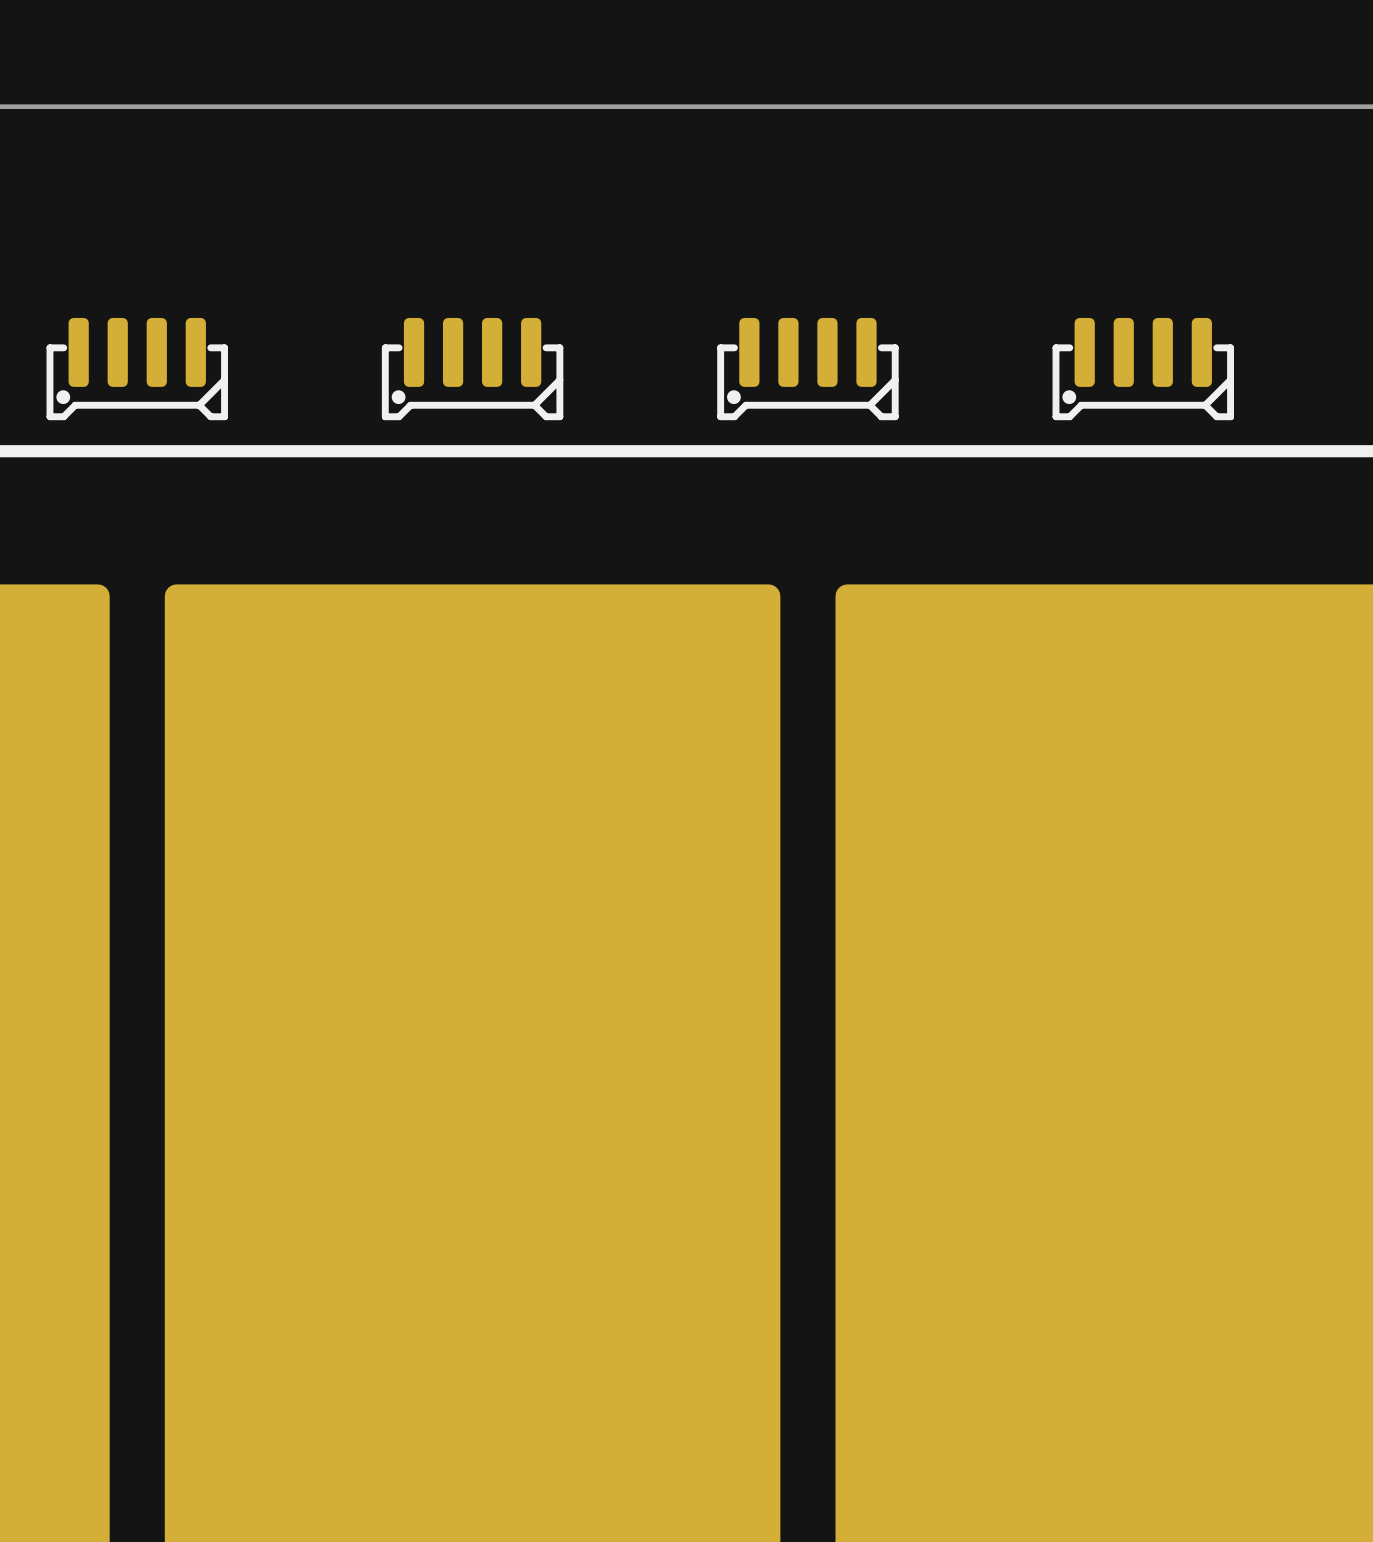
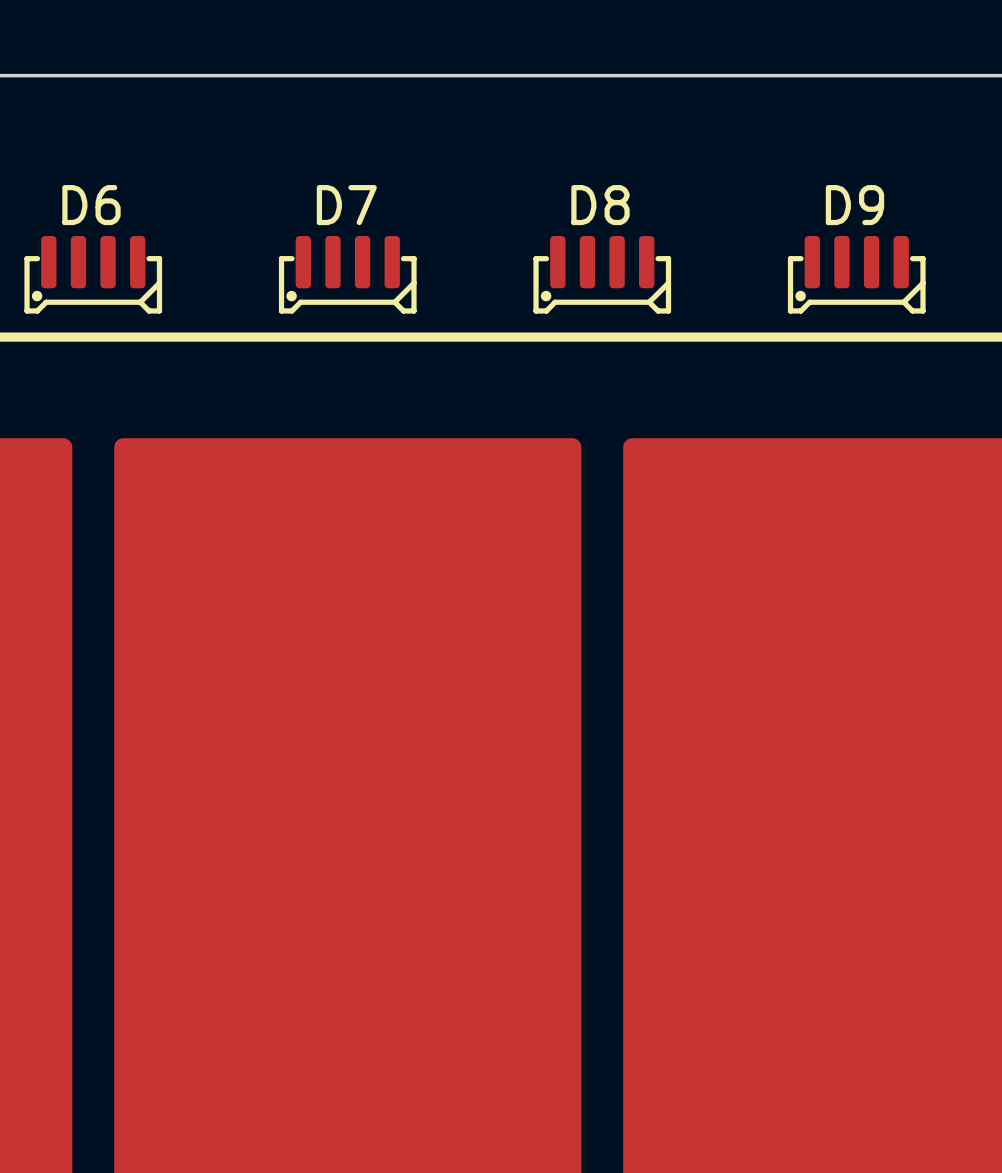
D6 name: none -> D6 (91, 205)
D7 name: none -> D7 (346, 205)
D8 name: none -> D8 (600, 205)
D9 name: none -> D9 (854, 205)

